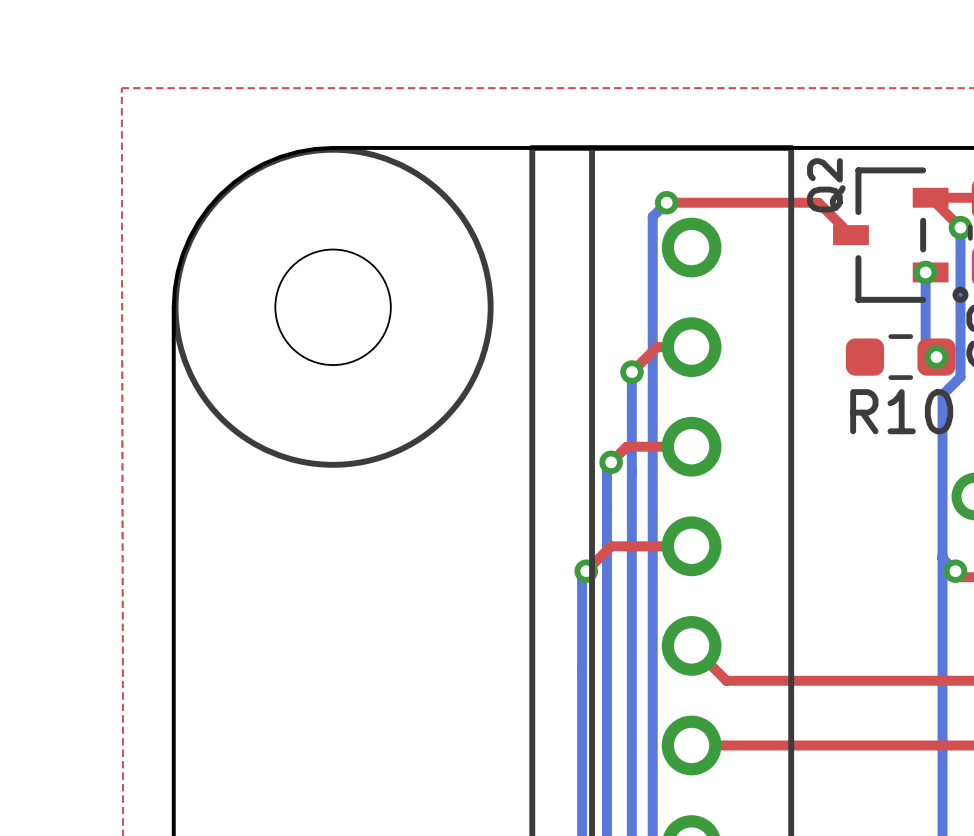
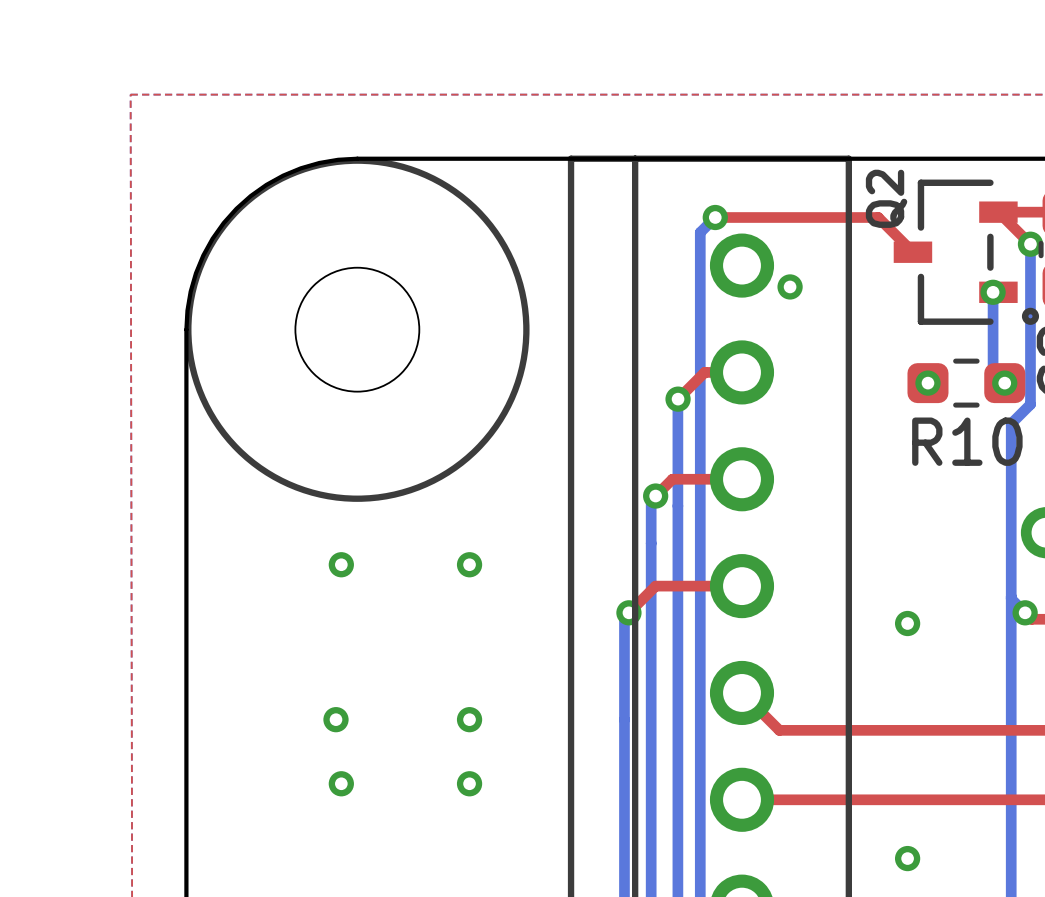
via: none -> (790, 286)
via: none -> (927, 383)
via: none -> (341, 564)
via: none -> (469, 564)
via: none -> (907, 623)
via: none -> (335, 719)
via: none -> (469, 719)
via: none -> (341, 783)
via: none -> (469, 783)
via: none -> (907, 858)

